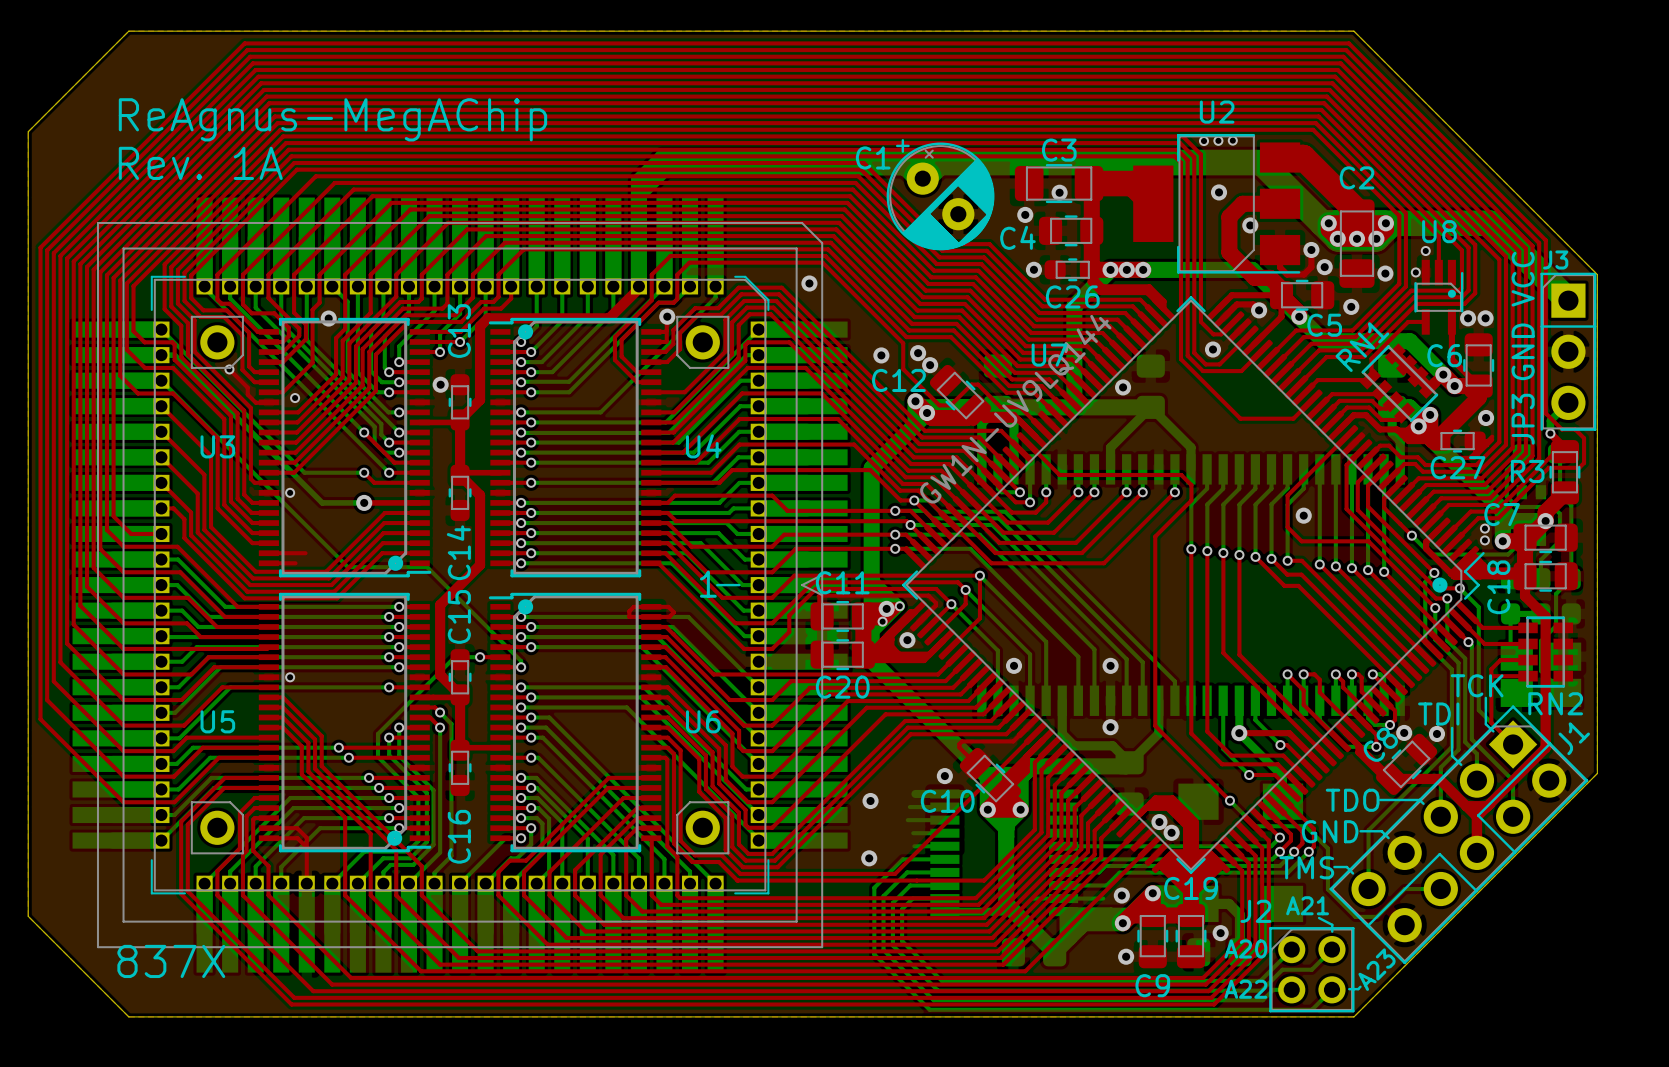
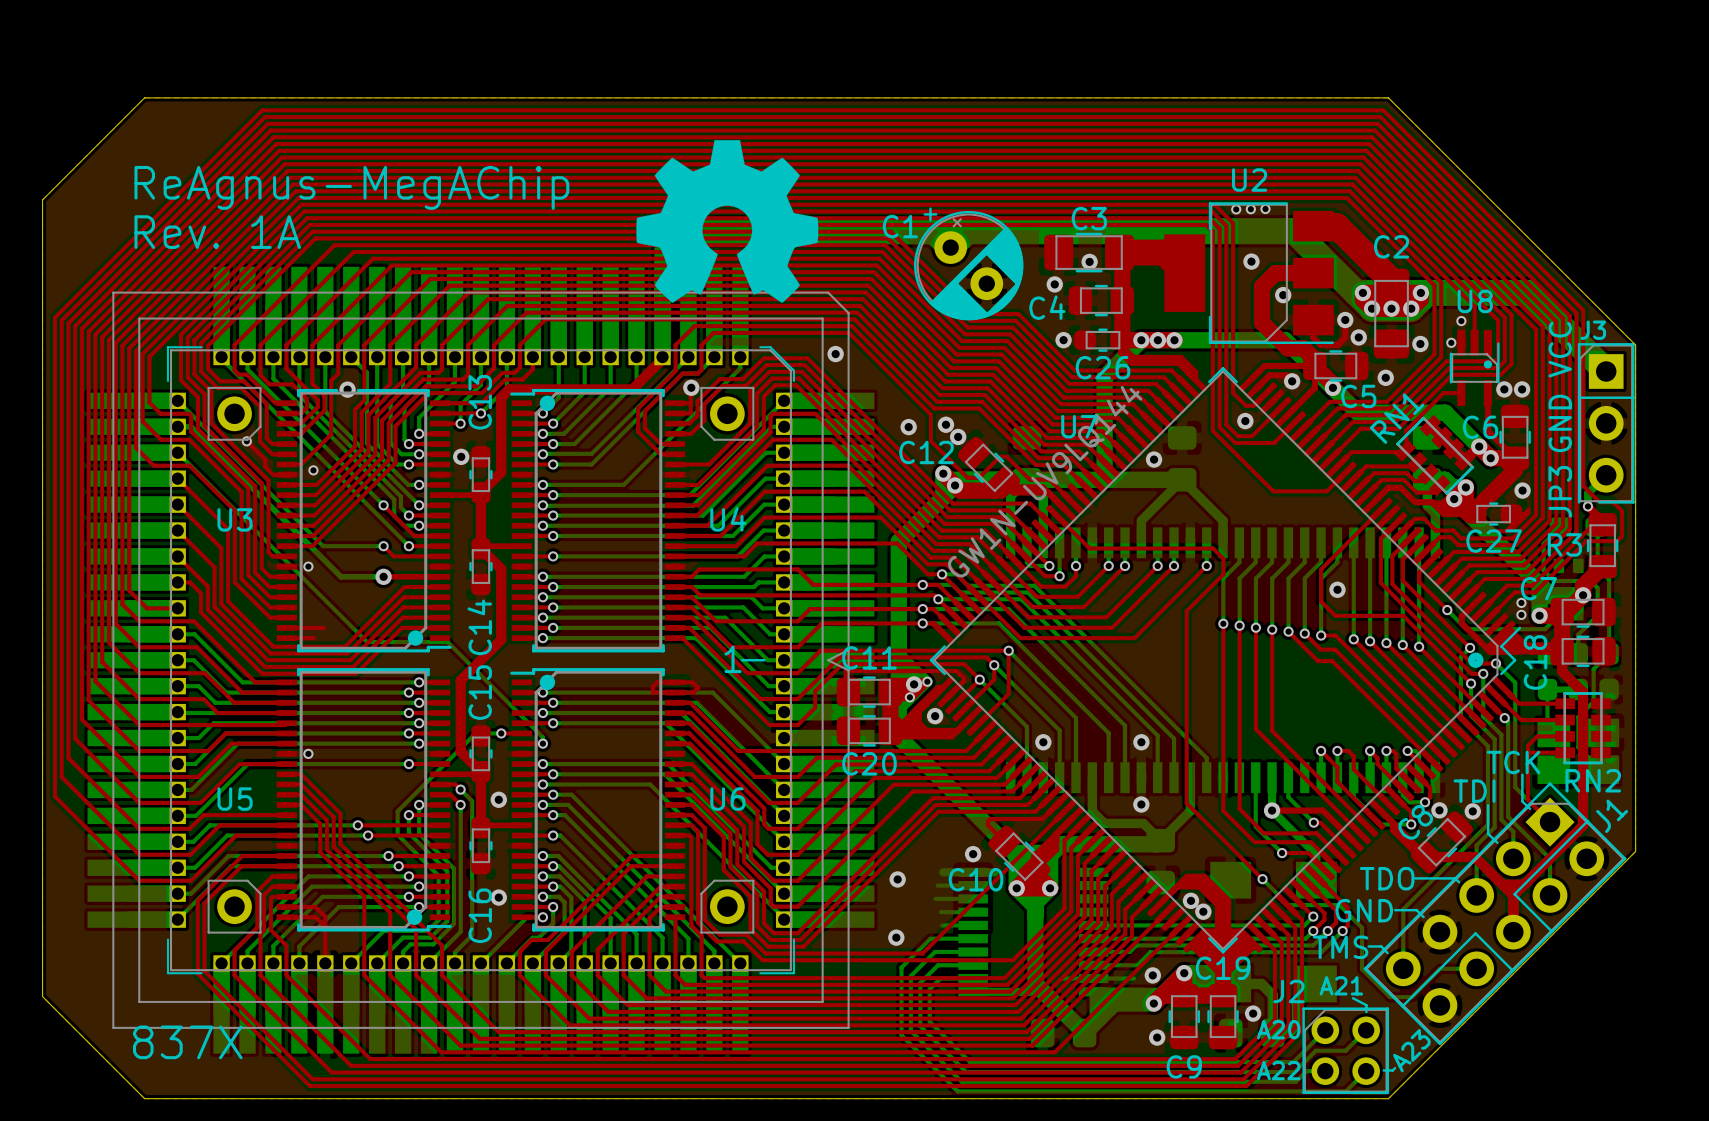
drawing: none -> [636, 140, 819, 303]
via: none -> (498, 799)
via: none -> (498, 897)

